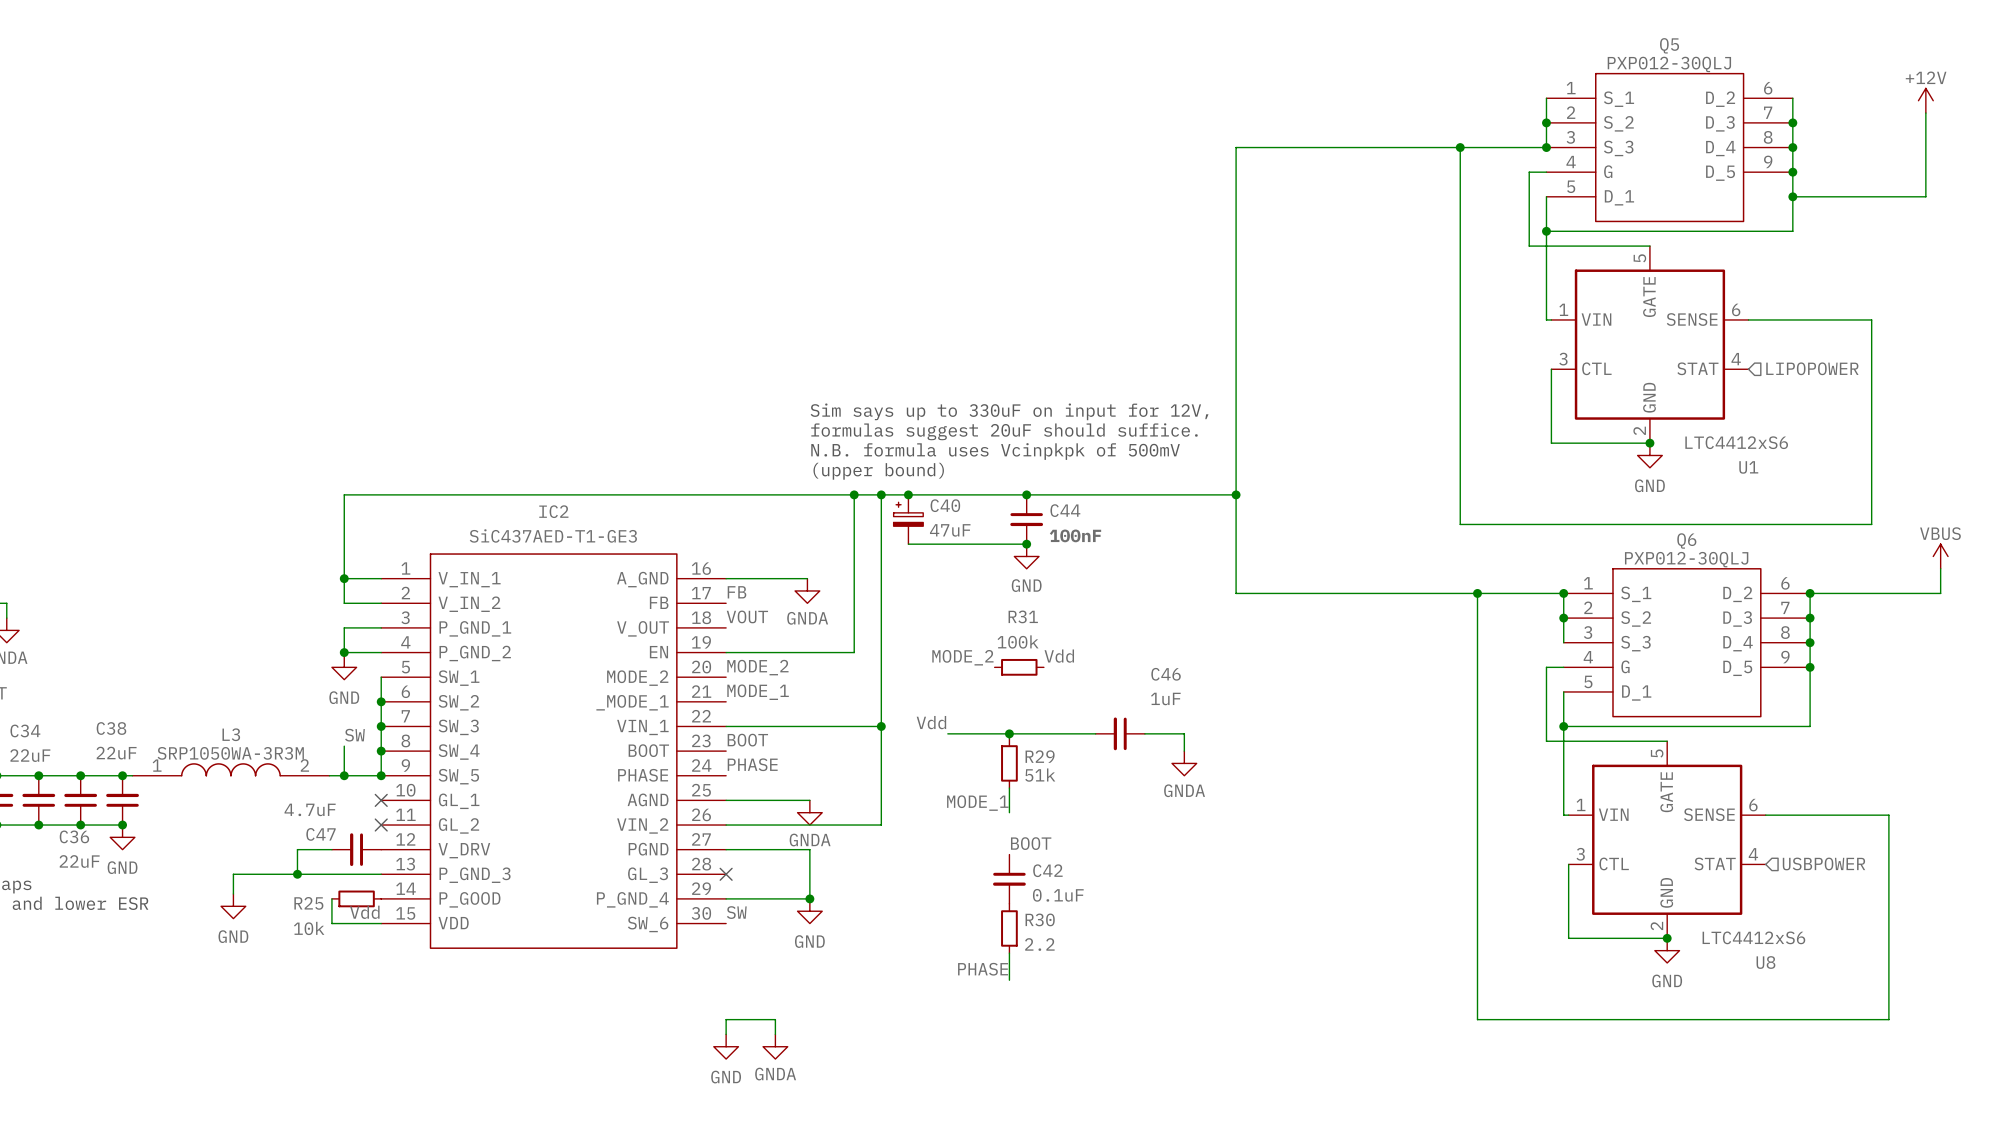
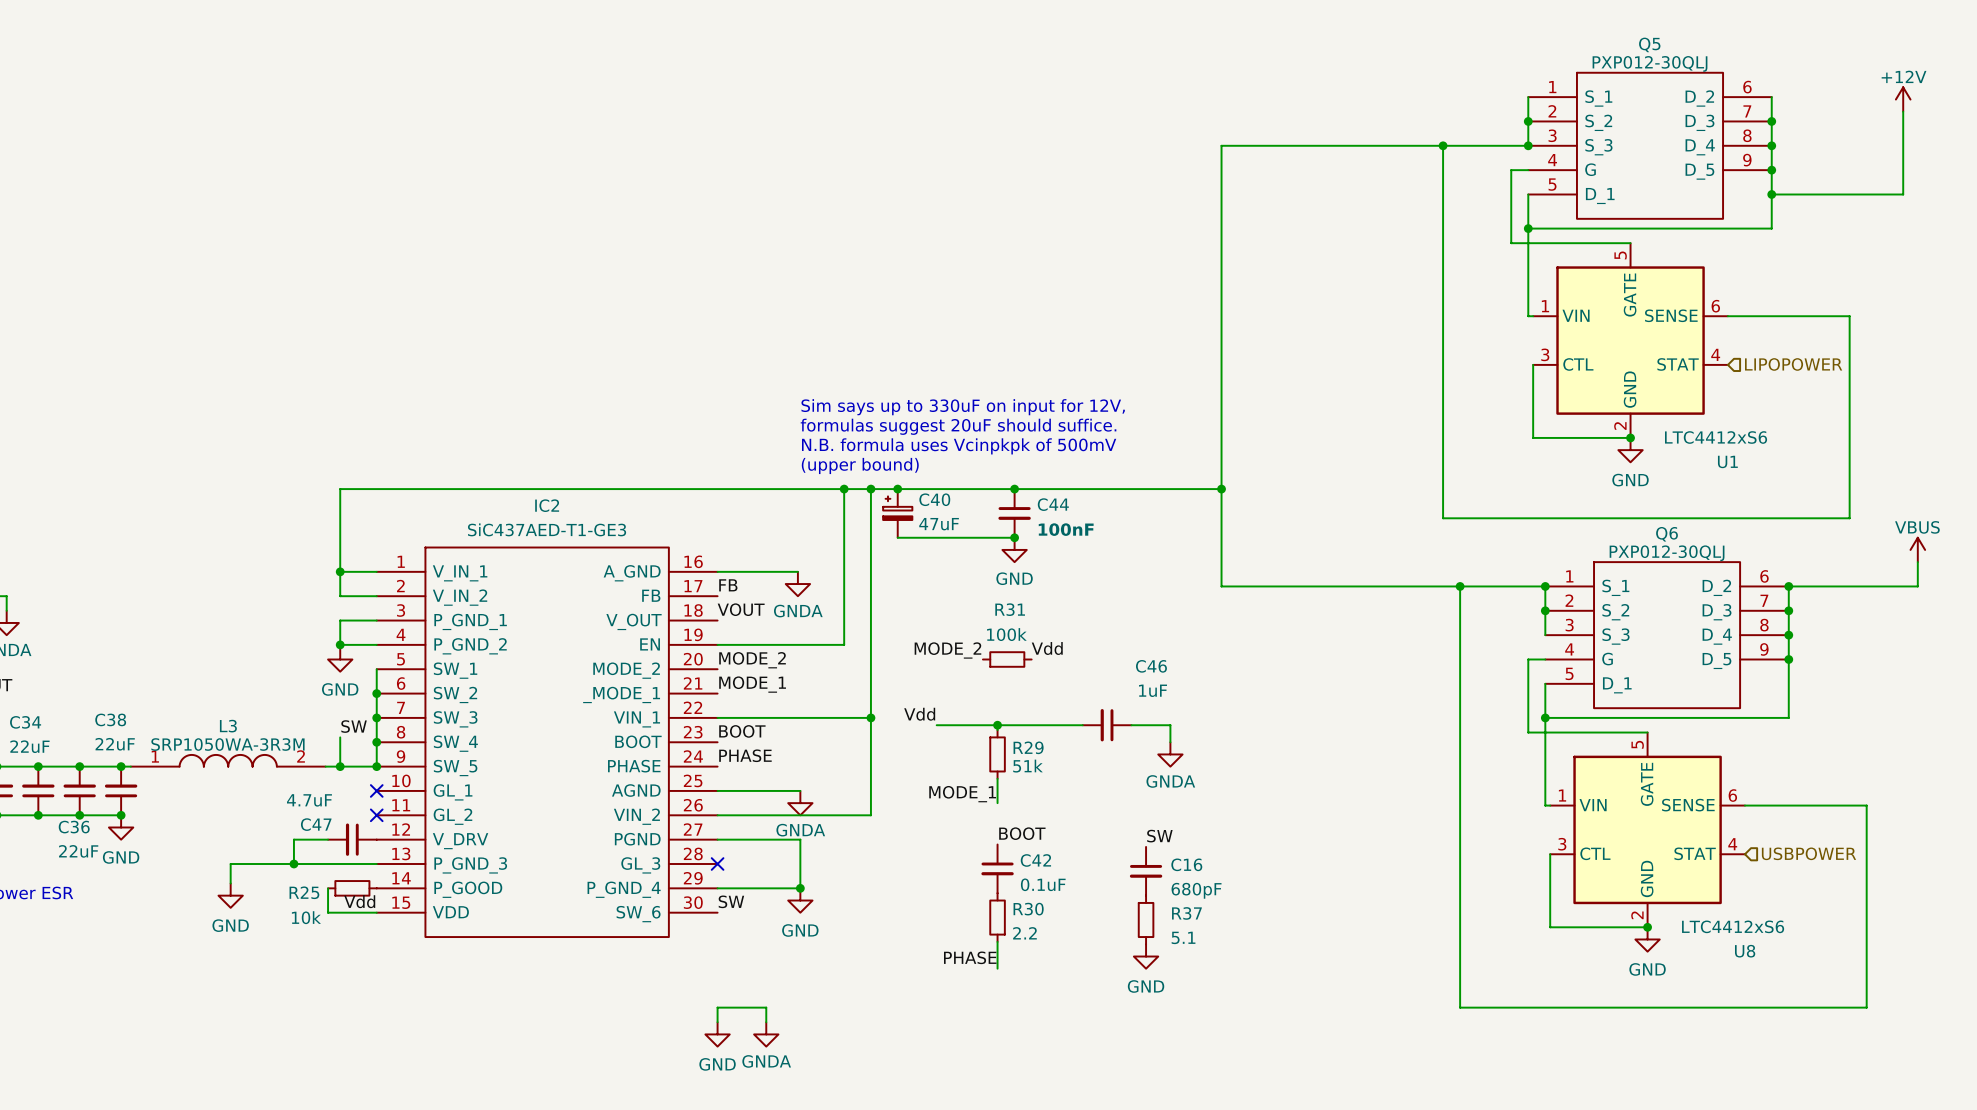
label: none -> SW (1159, 836)
C16: none -> 680pF (1146, 871)
R37: none -> 5.1 (1146, 919)
power symbol: none -> GND (1146, 956)

